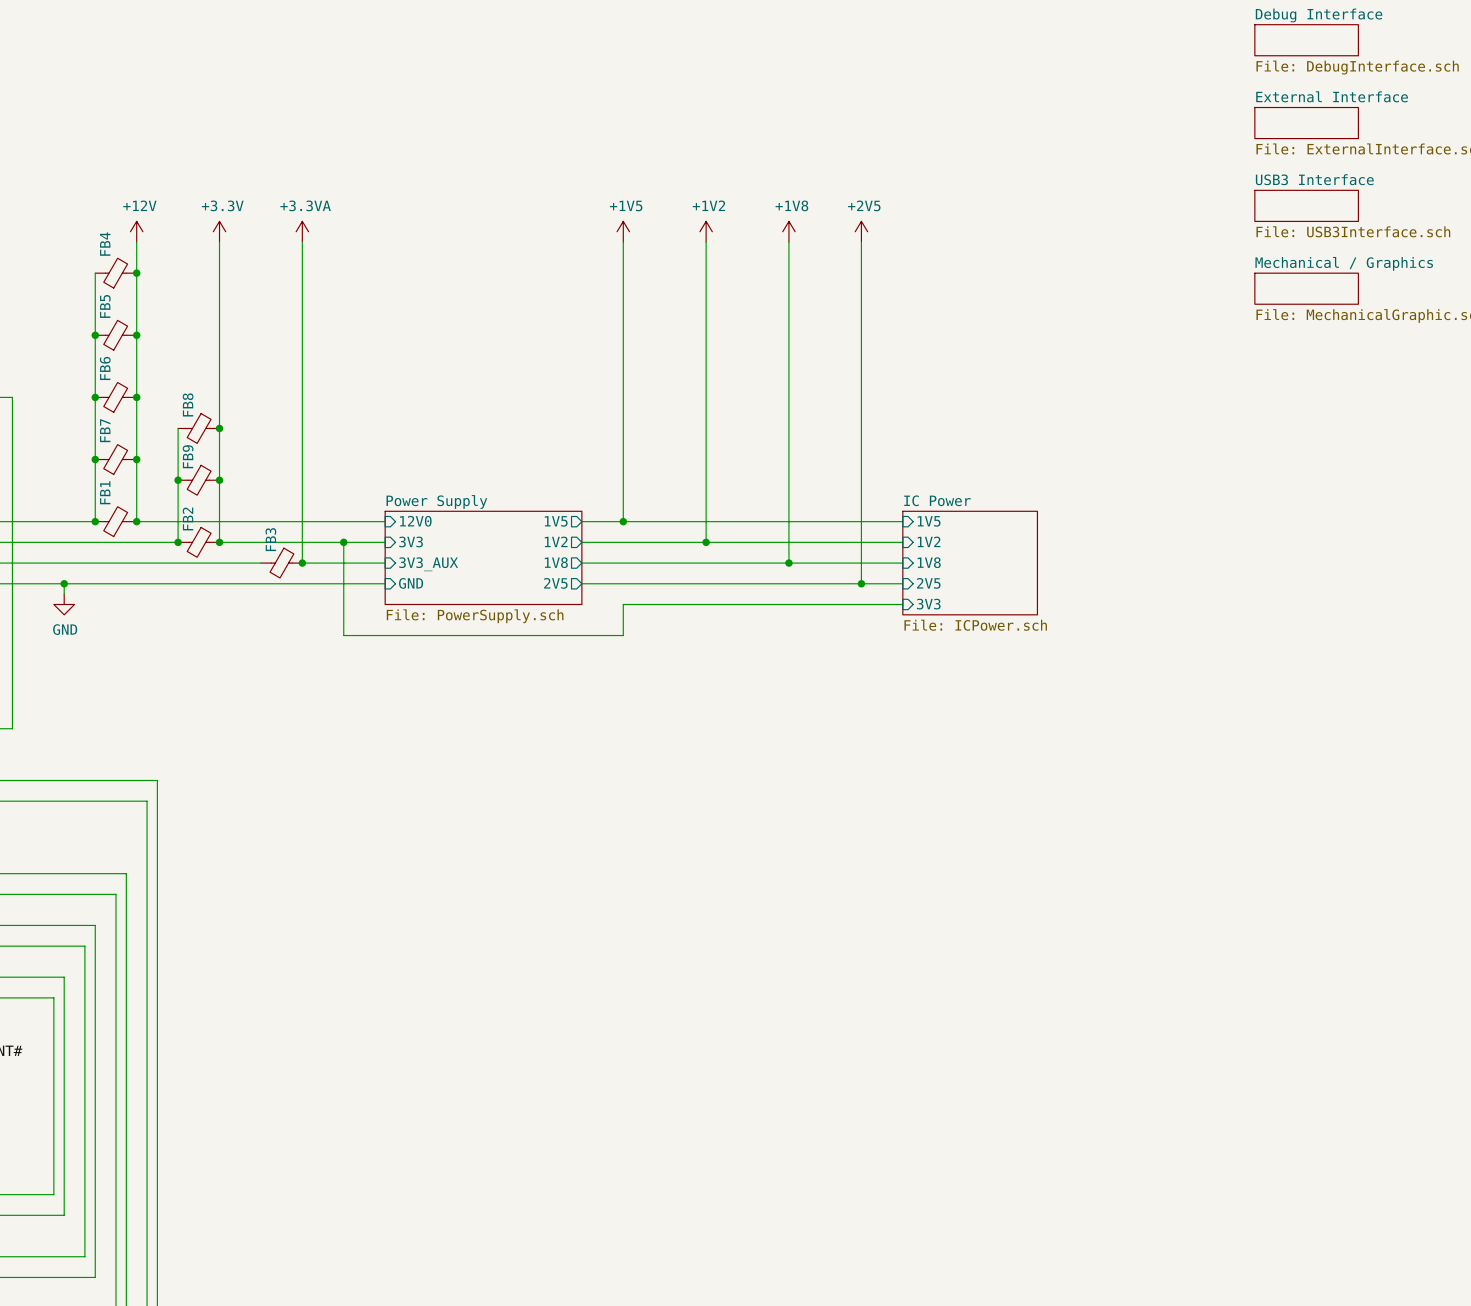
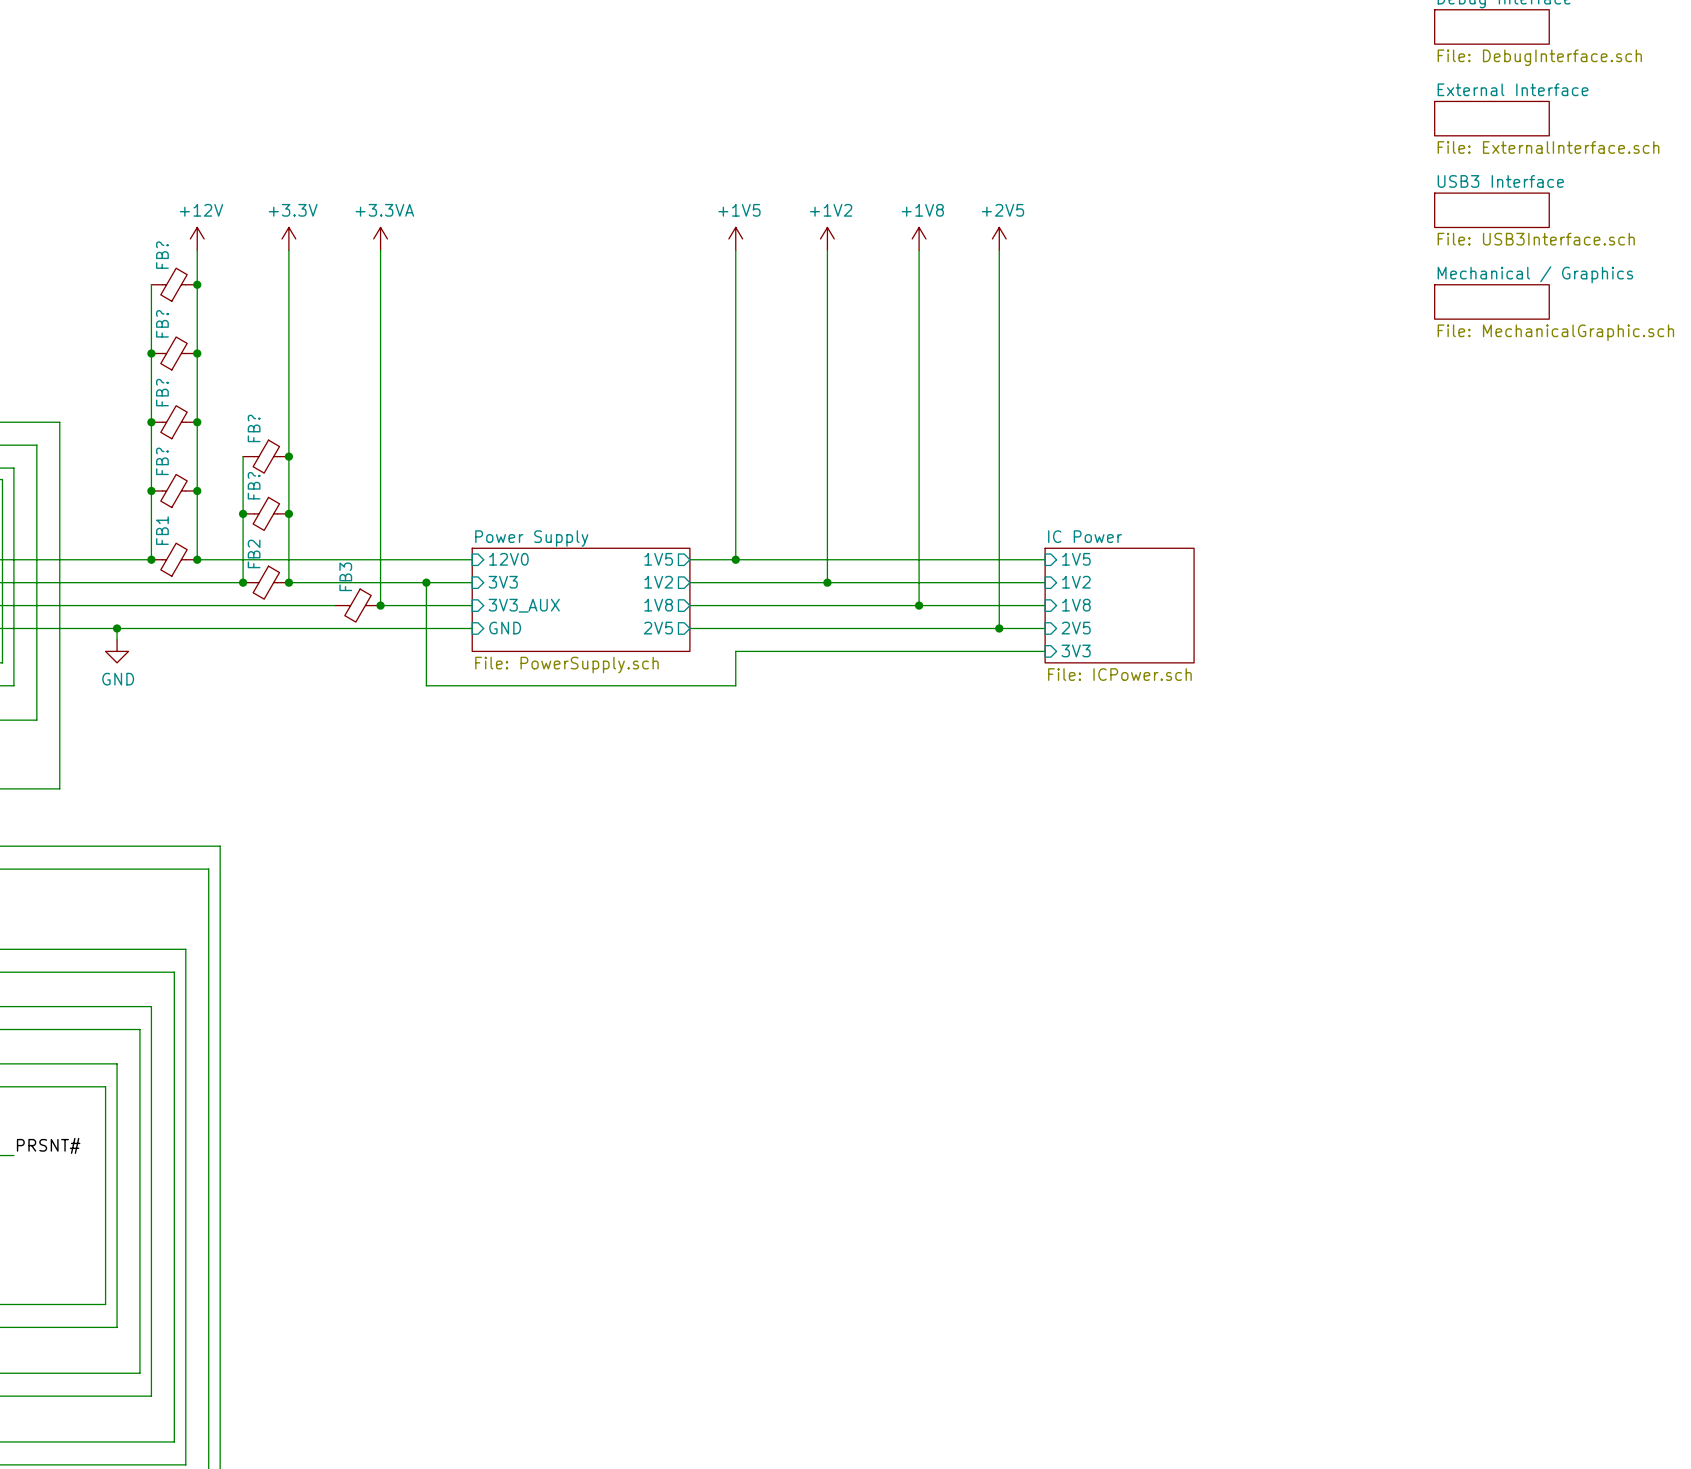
FB4 name: FB4 (105, 244) -> FB? (162, 255)
FB5 name: FB5 (105, 306) -> FB? (162, 323)
FB6 name: FB6 (105, 368) -> FB? (162, 392)
FB8 name: FB8 (188, 404) -> FB? (254, 428)
FB7 name: FB7 (105, 430) -> FB? (162, 461)
FB9 name: FB9 (188, 456) -> FB? (254, 485)

